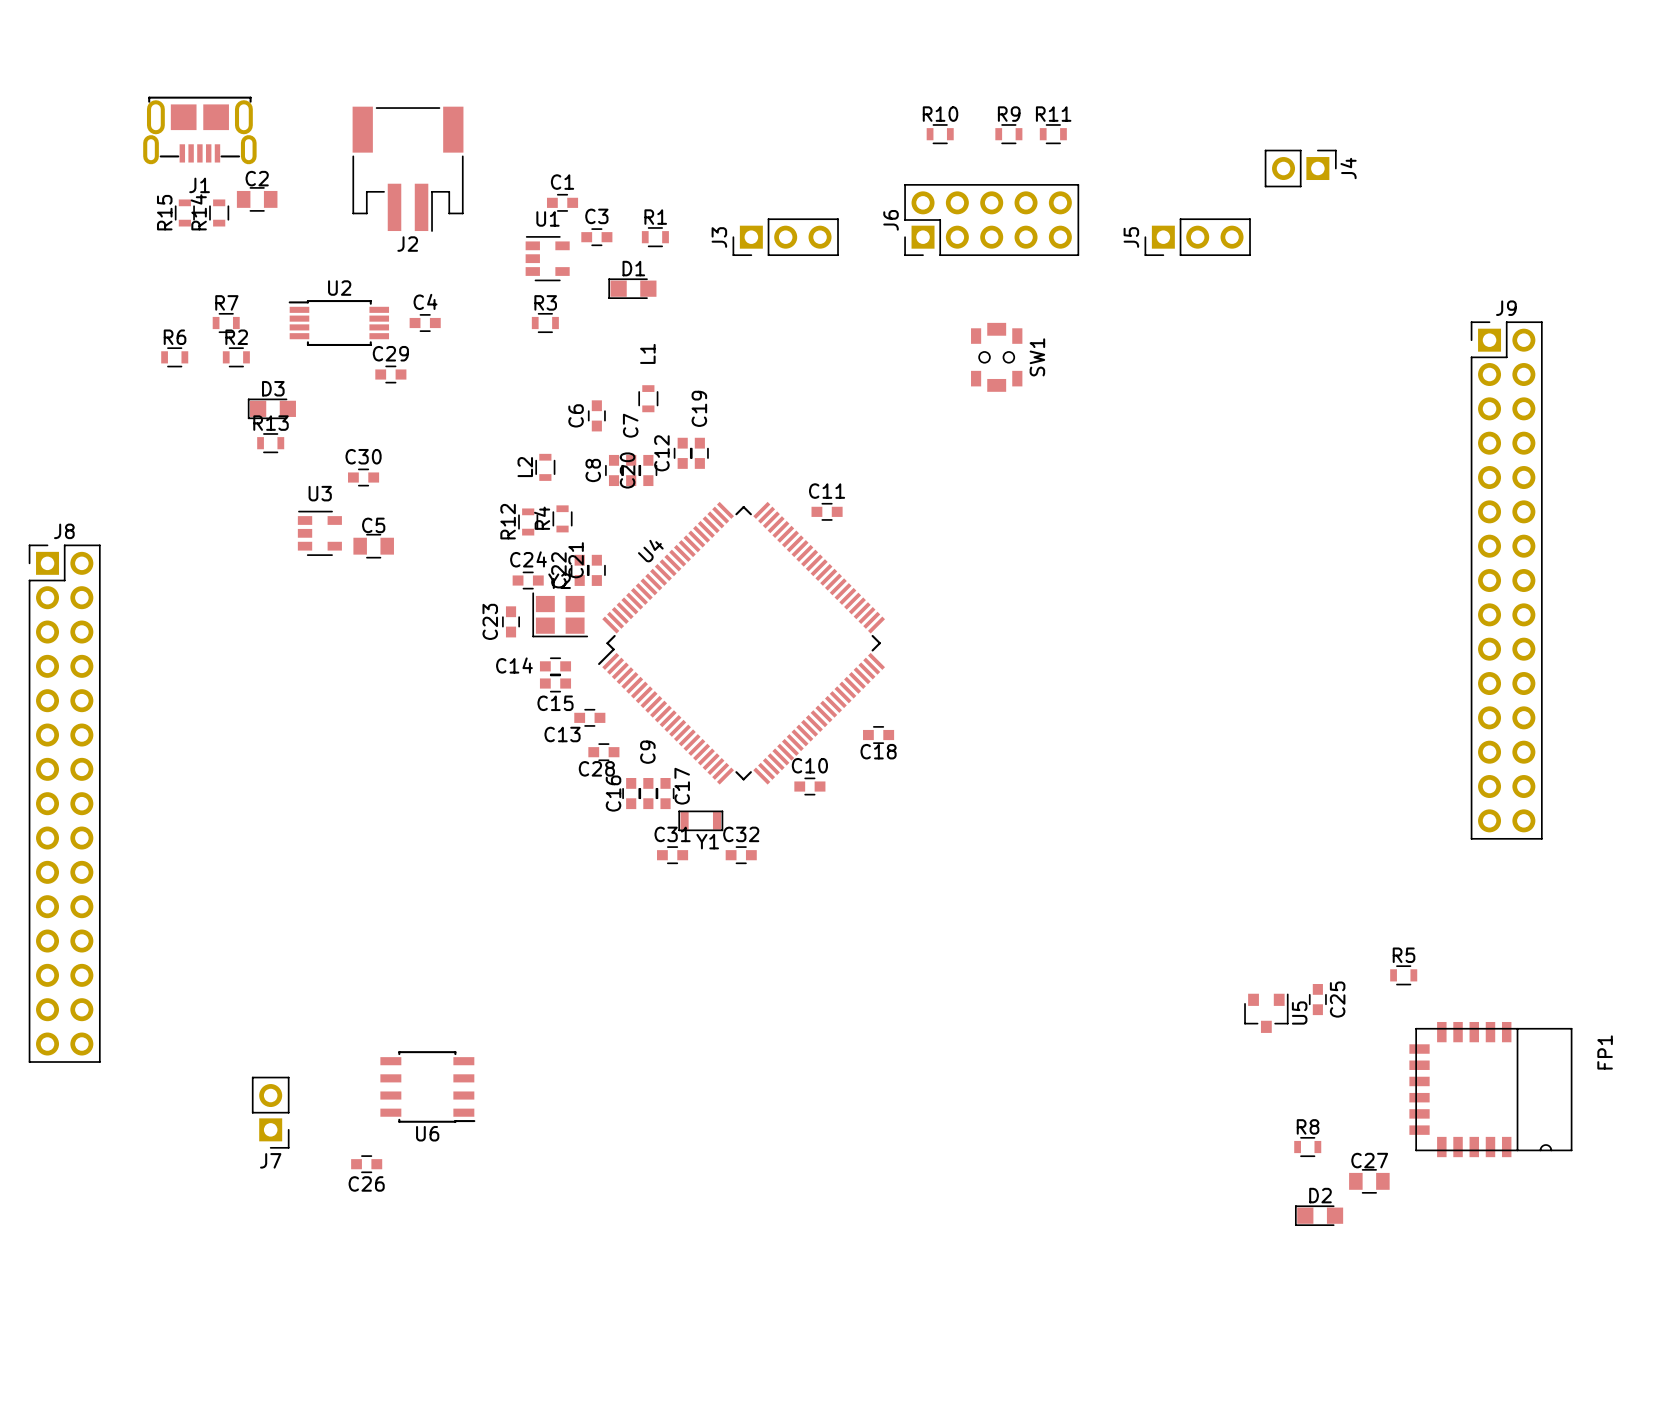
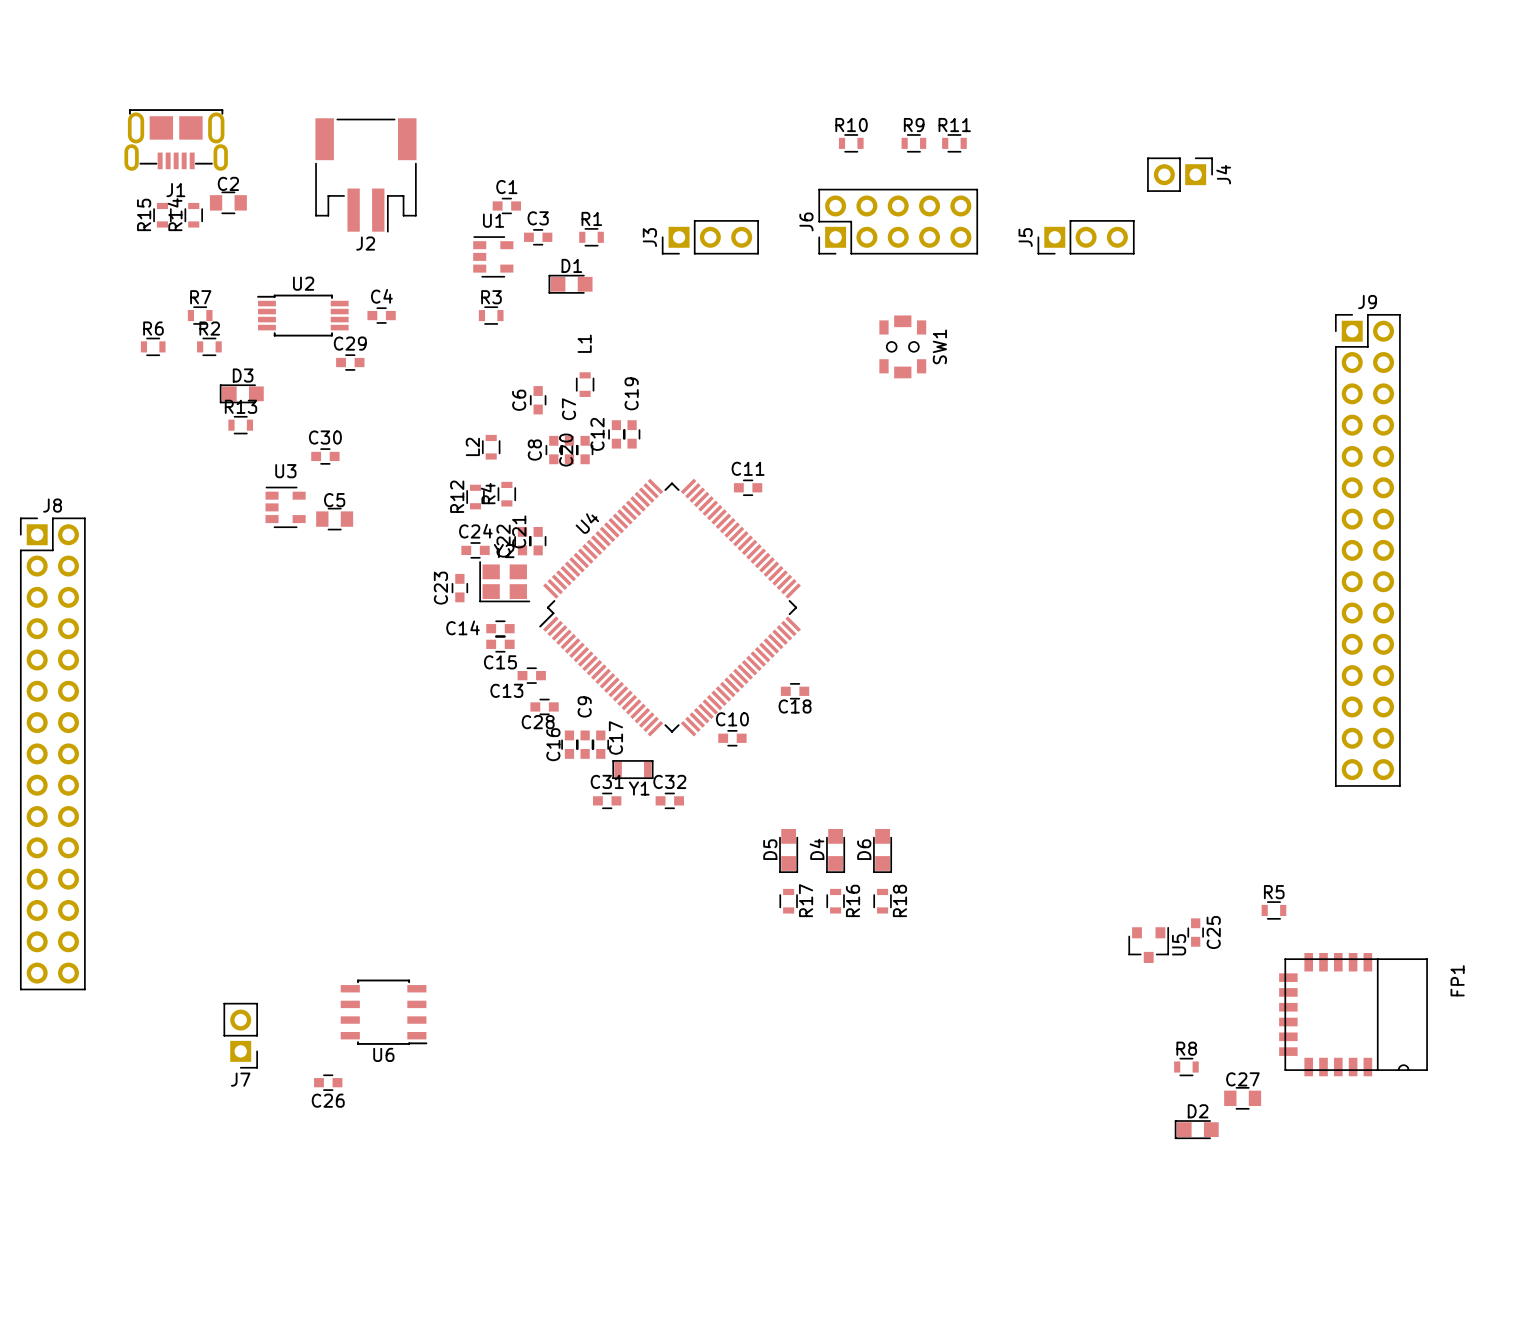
D5: none -> (788, 850)
D4: none -> (835, 850)
D6: none -> (882, 850)
R17: none -> (788, 901)
R16: none -> (835, 901)
R18: none -> (882, 901)

